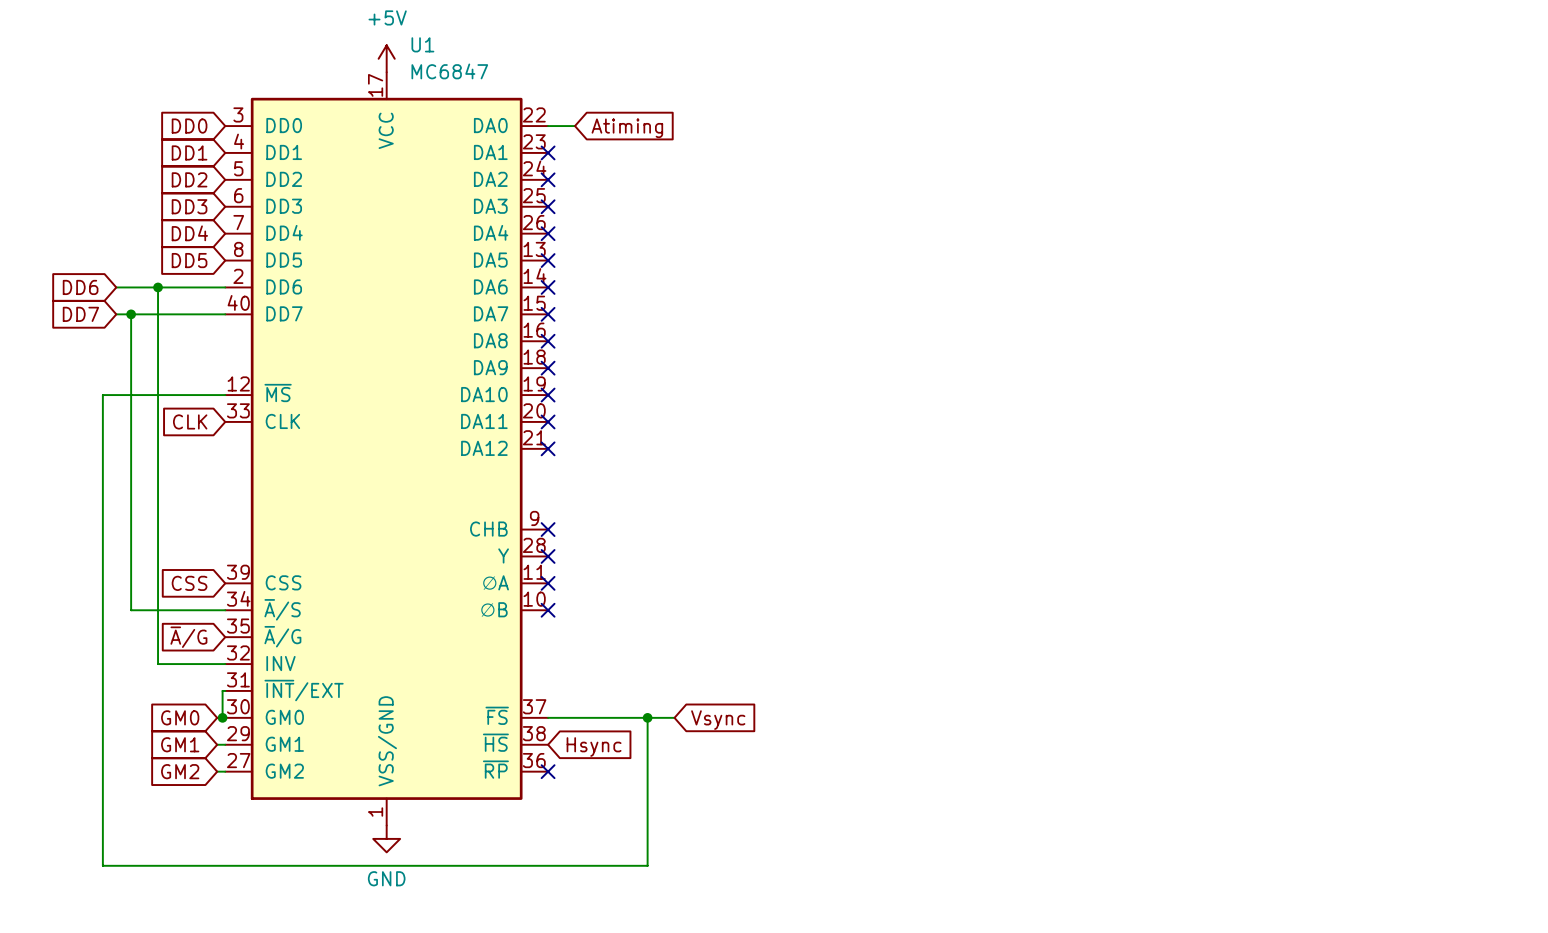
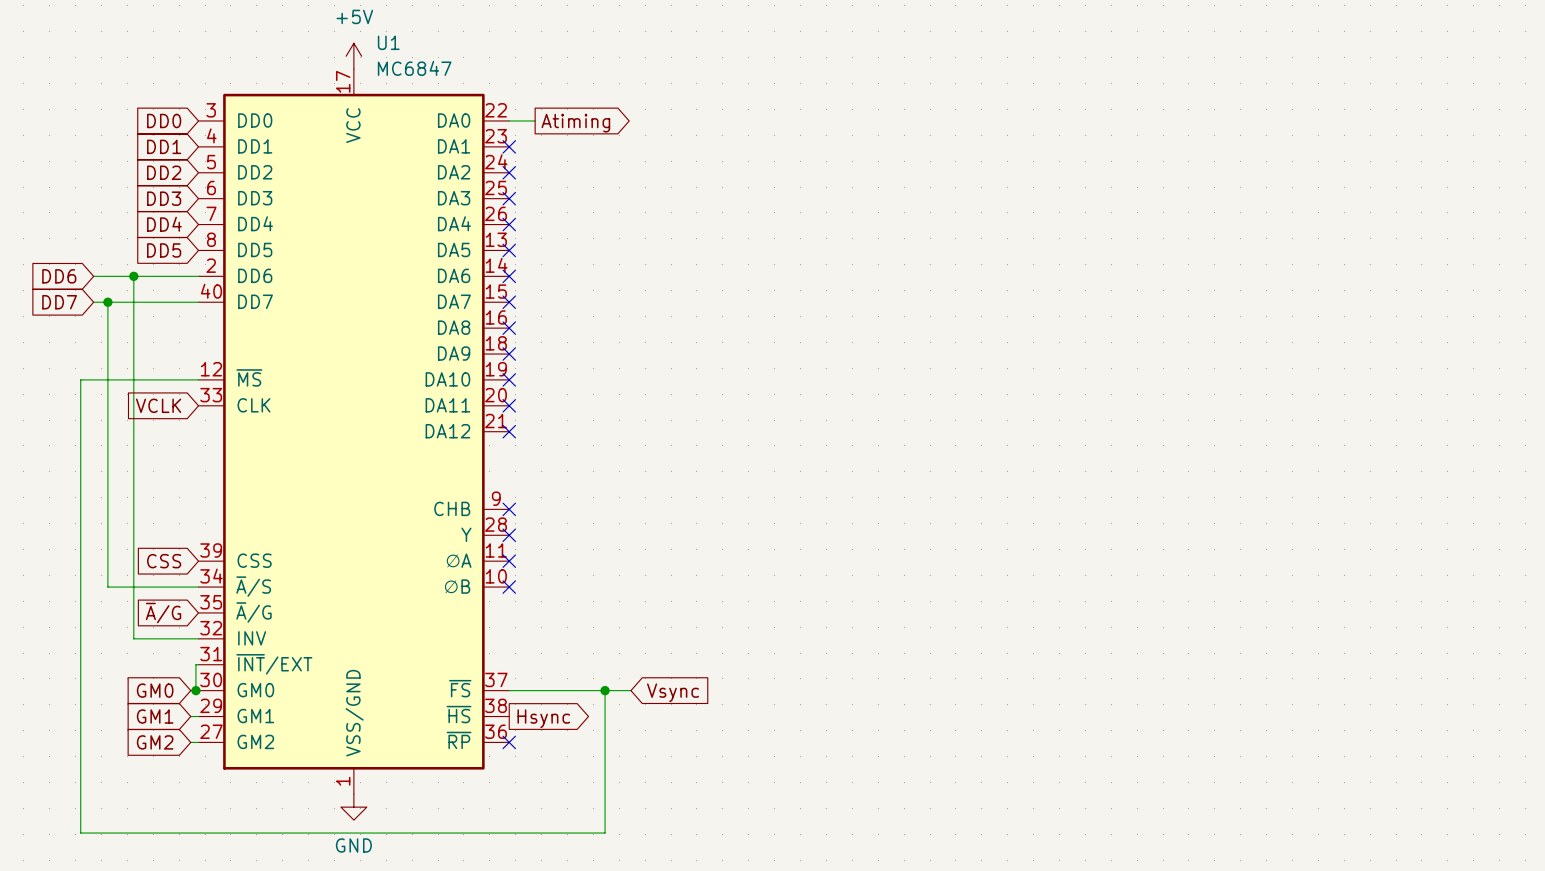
global label shape: input (627, 128) -> output (575, 123)
global label: CLK (190, 421) -> VCLK (158, 405)
global label shape: input (594, 747) -> output (543, 718)

